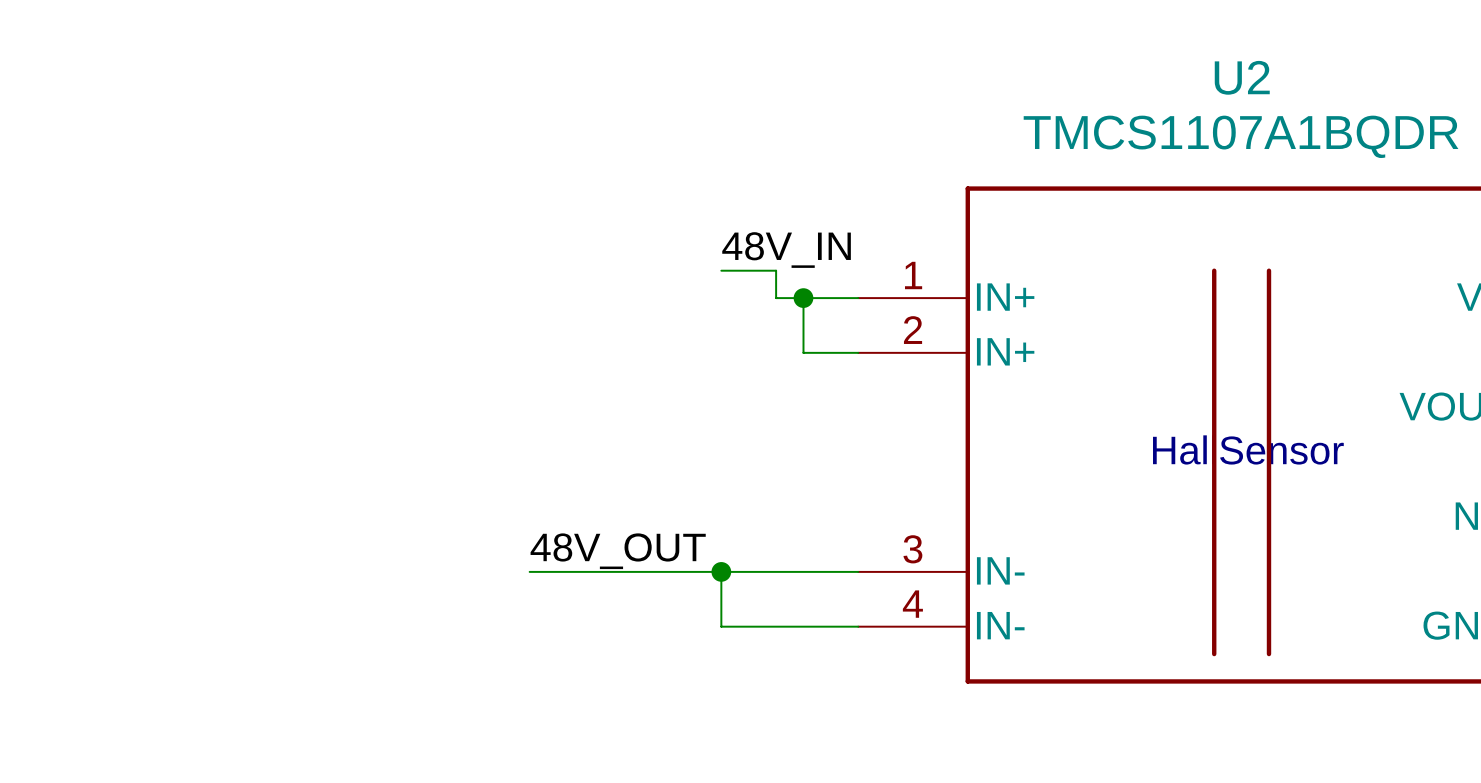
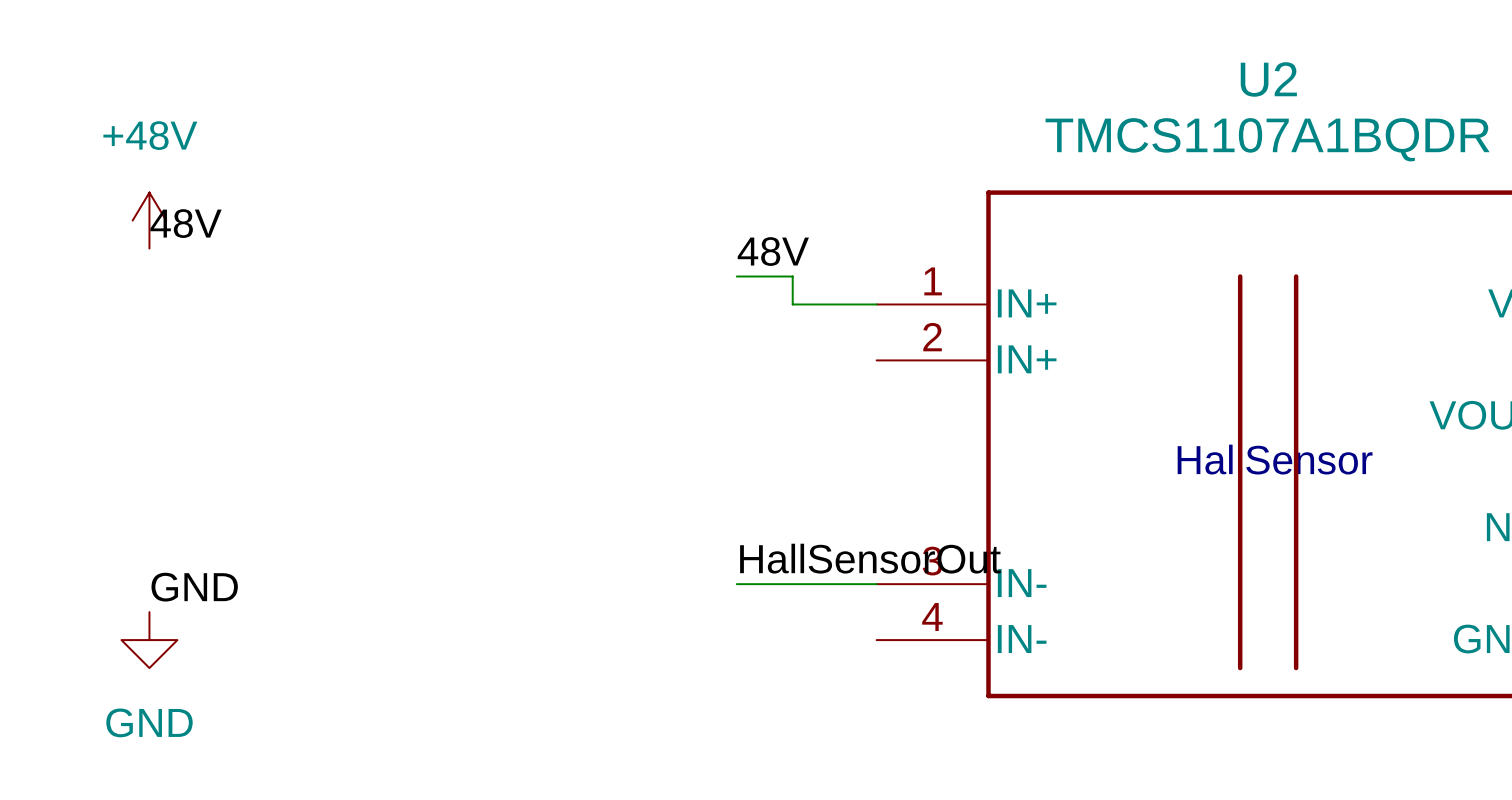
power symbol: none -> +48V (149, 220)
label: none -> 48V (185, 223)
label: 48V_IN (786, 250) -> 48V (773, 251)
wire: (803, 298) (803, 352) (858, 352) -> none
junction: (803, 298) -> none
label: none -> HallSensorOut (870, 558)
label: 48V_OUT (618, 551) -> none
wire: (529, 571) (721, 571) (721, 626) (858, 626) -> none
junction: (721, 571) -> none
label: none -> GND (194, 587)
power symbol: none -> GND (149, 640)

